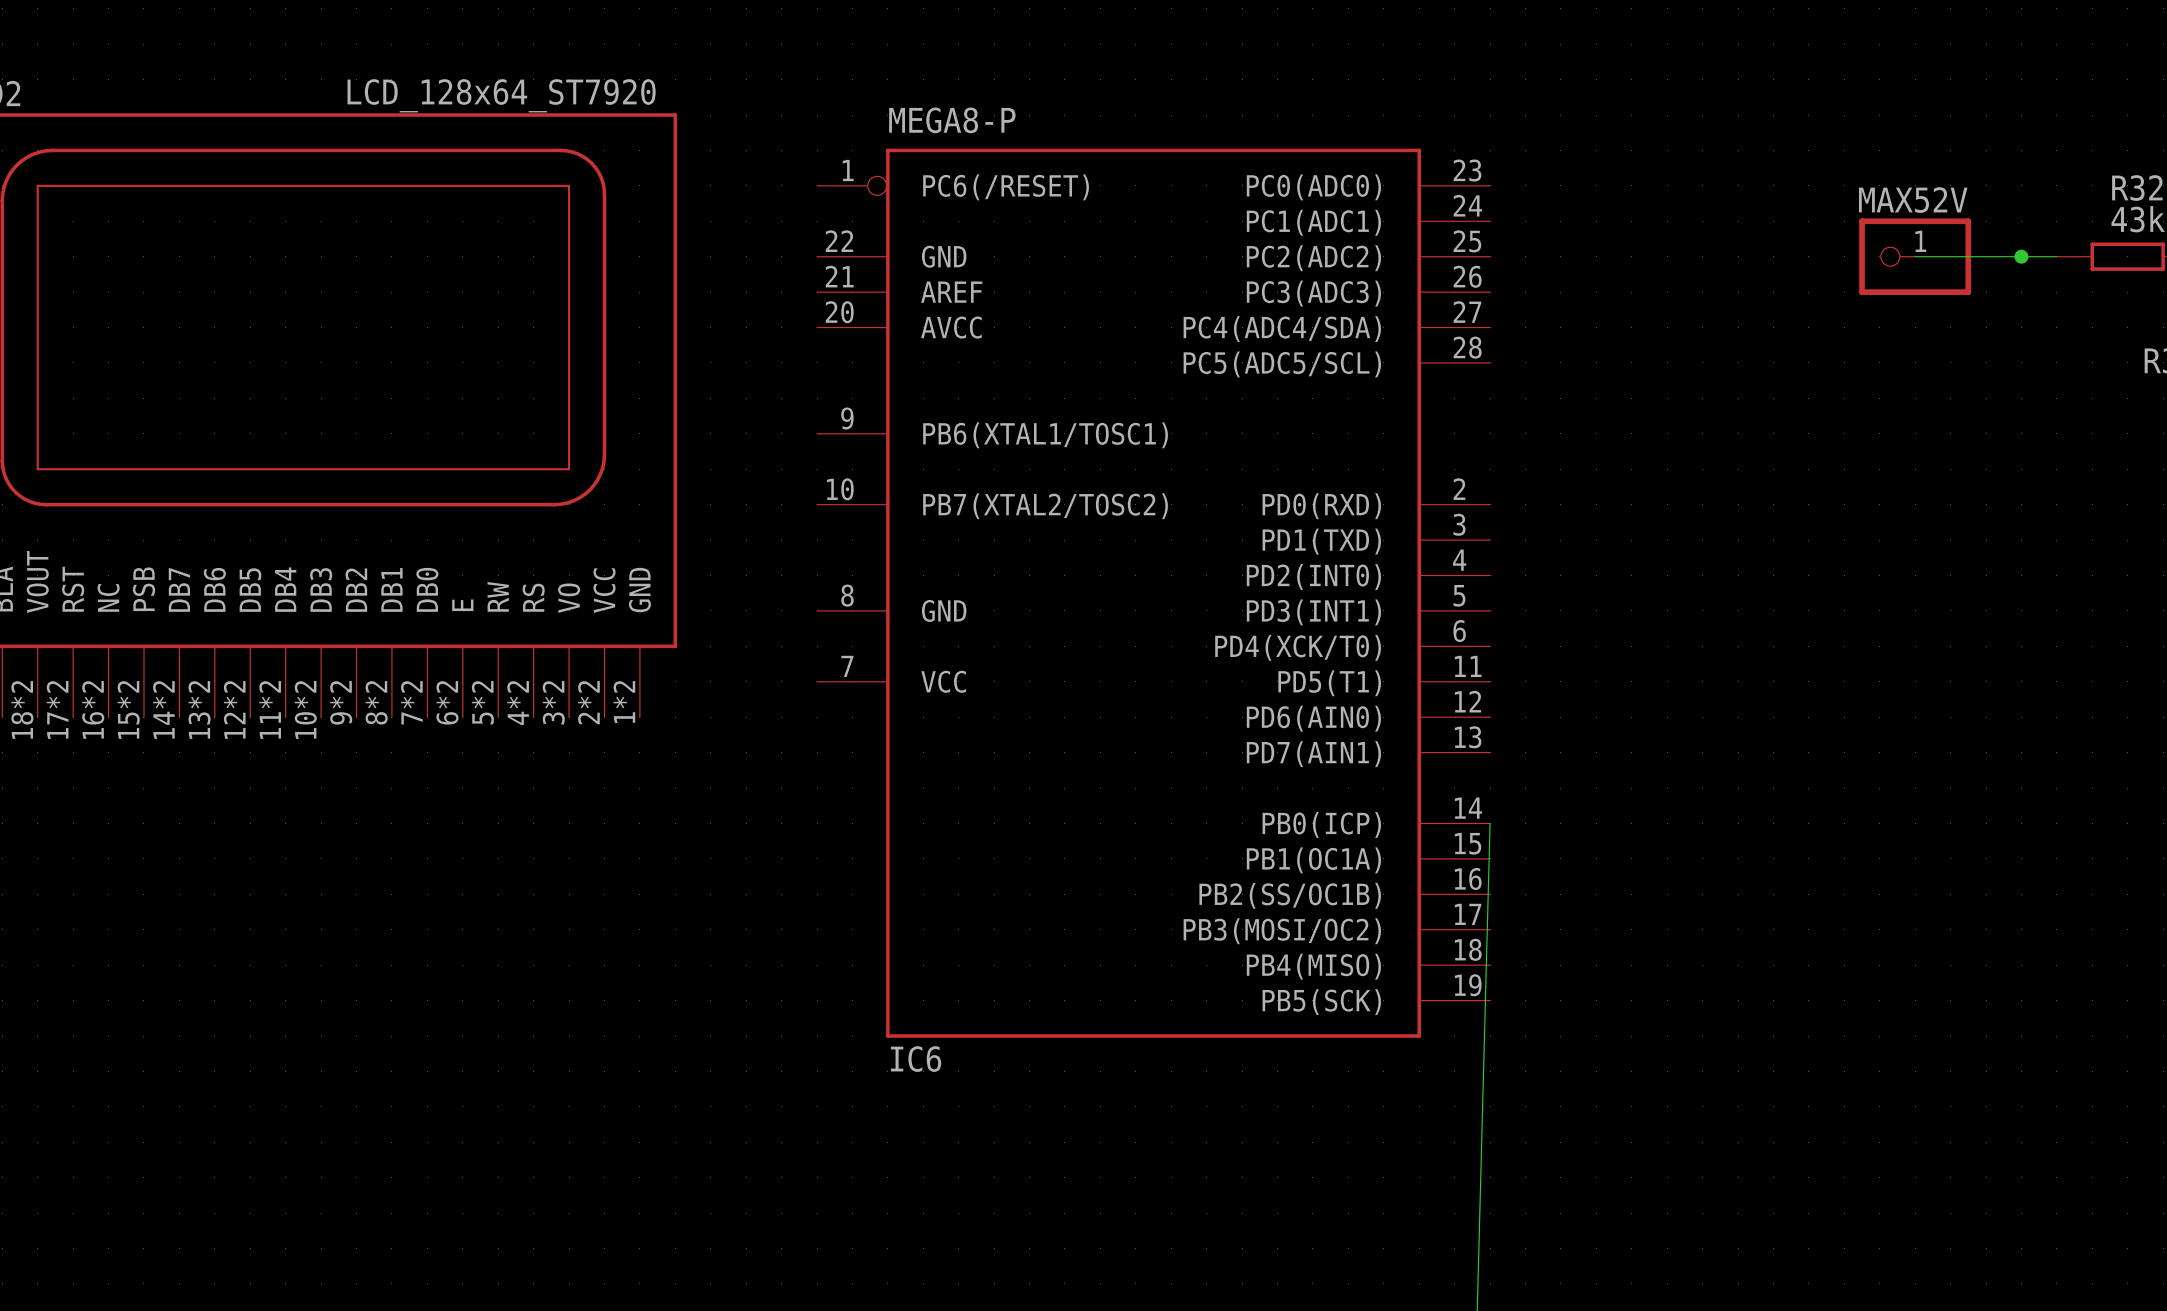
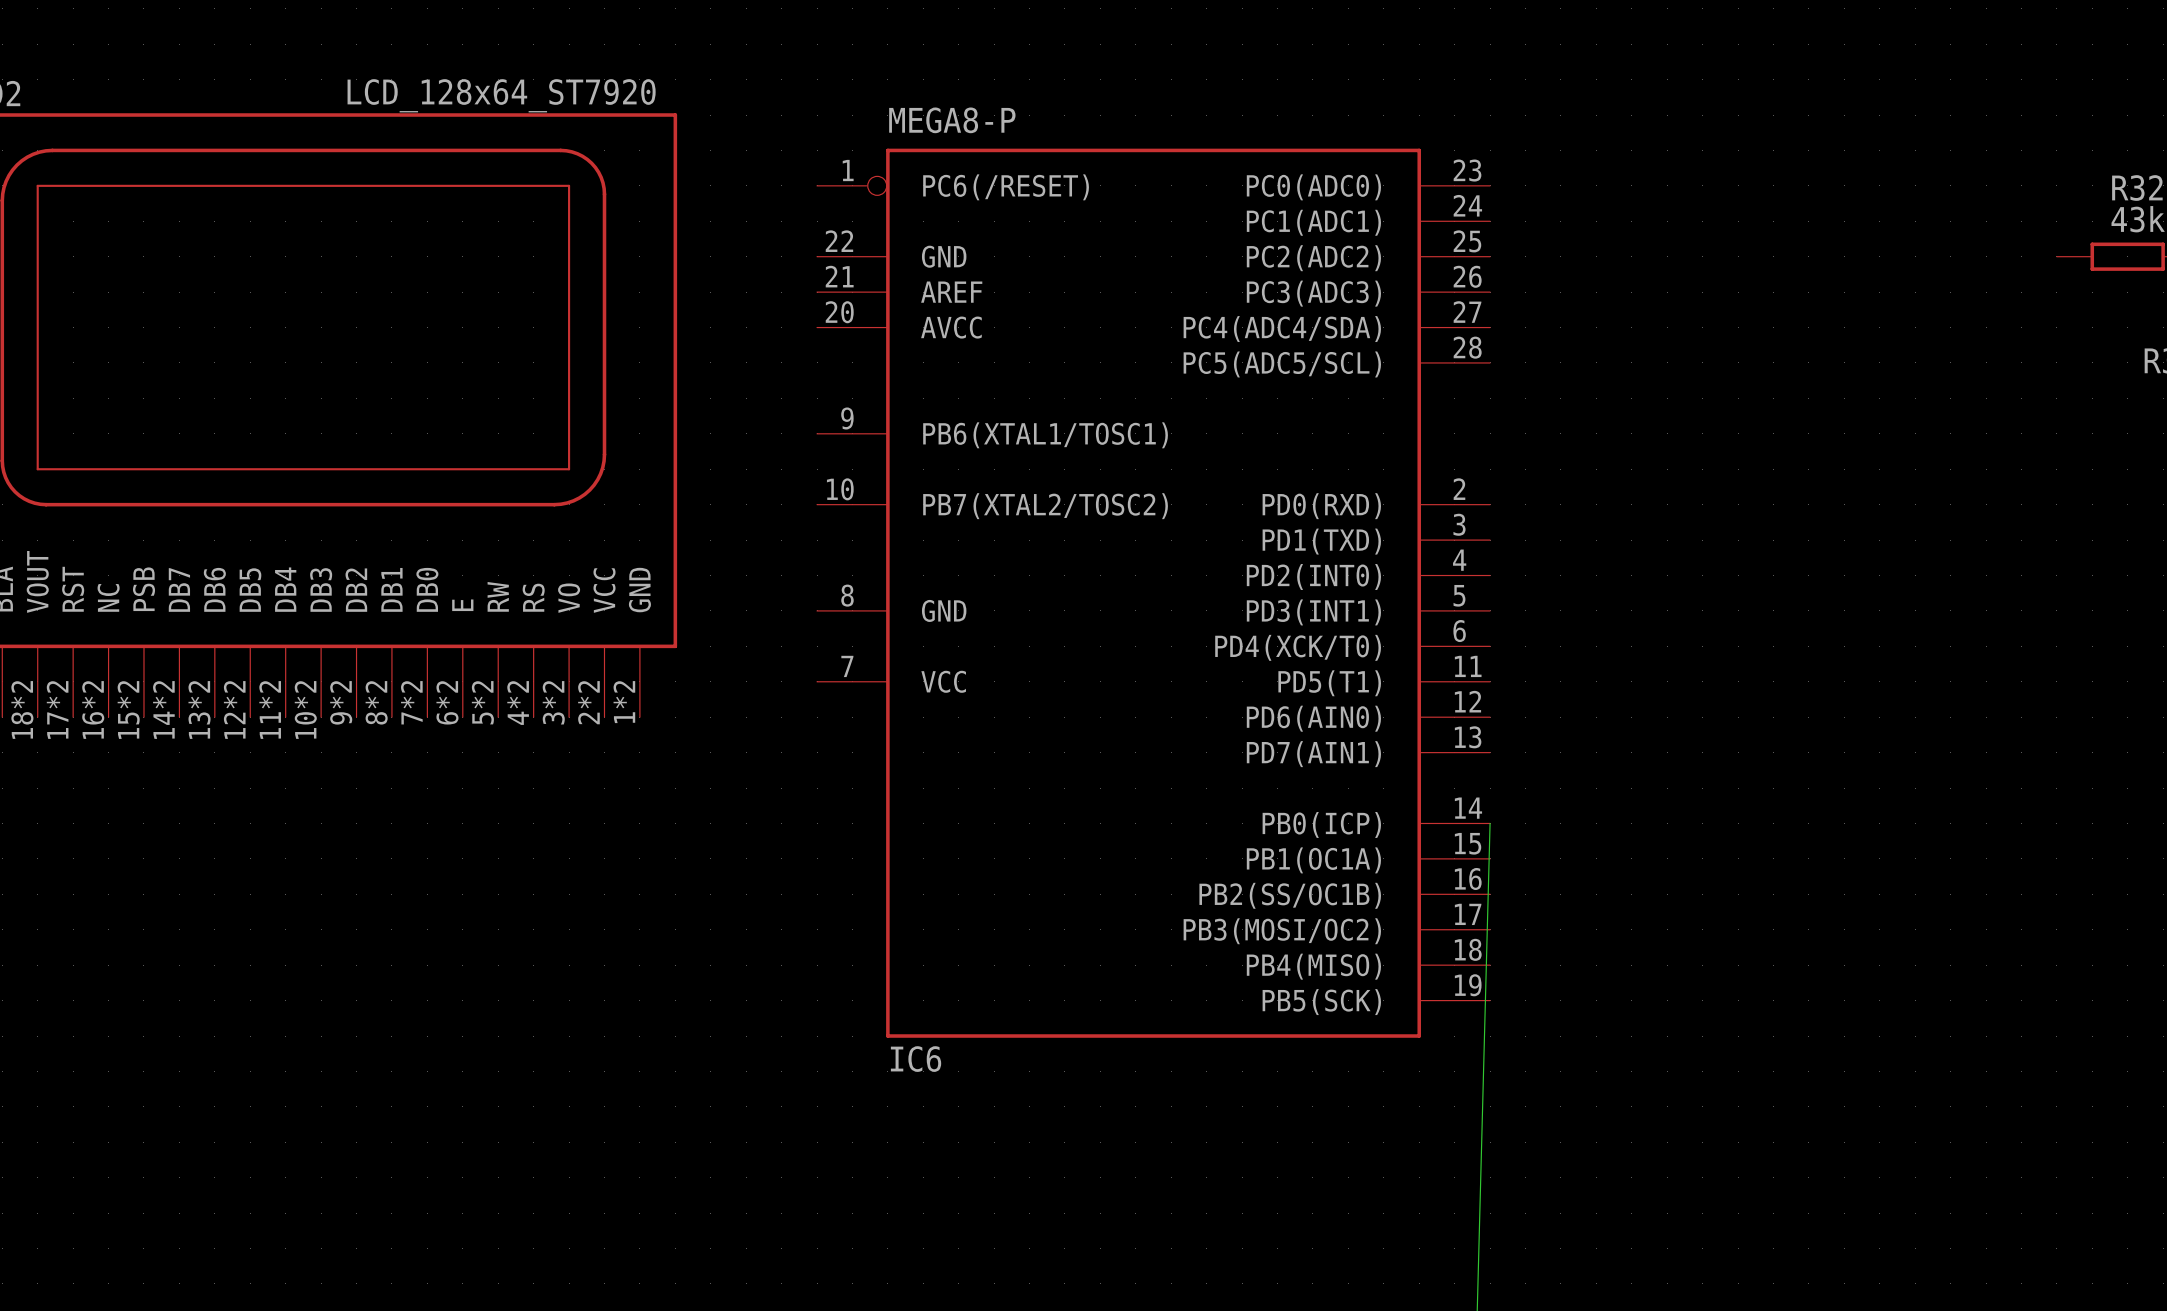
wire: (1915, 256) (2056, 256) -> none
MAX52V: (1915, 256) -> none
junction: (2021, 256) -> none

